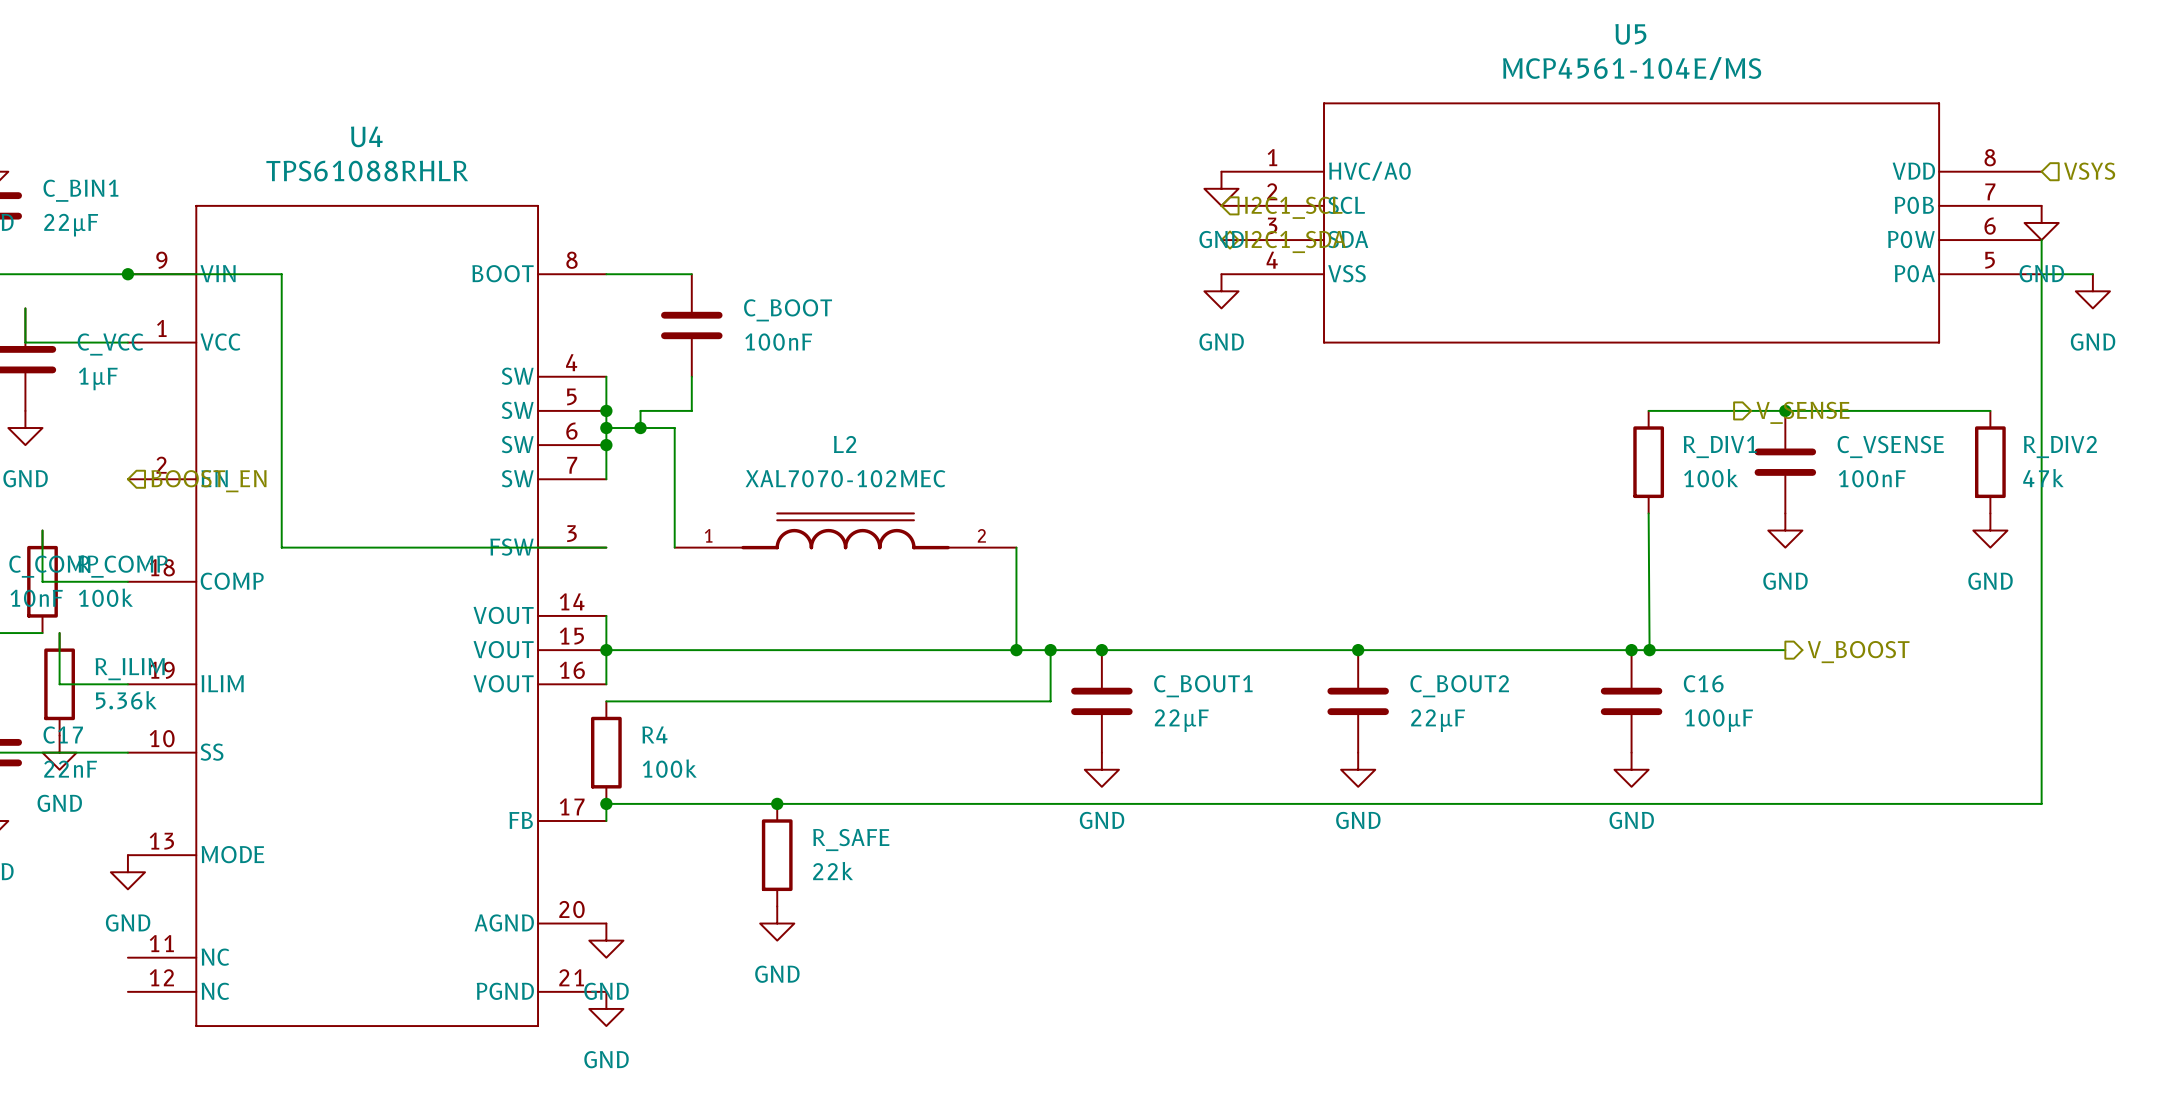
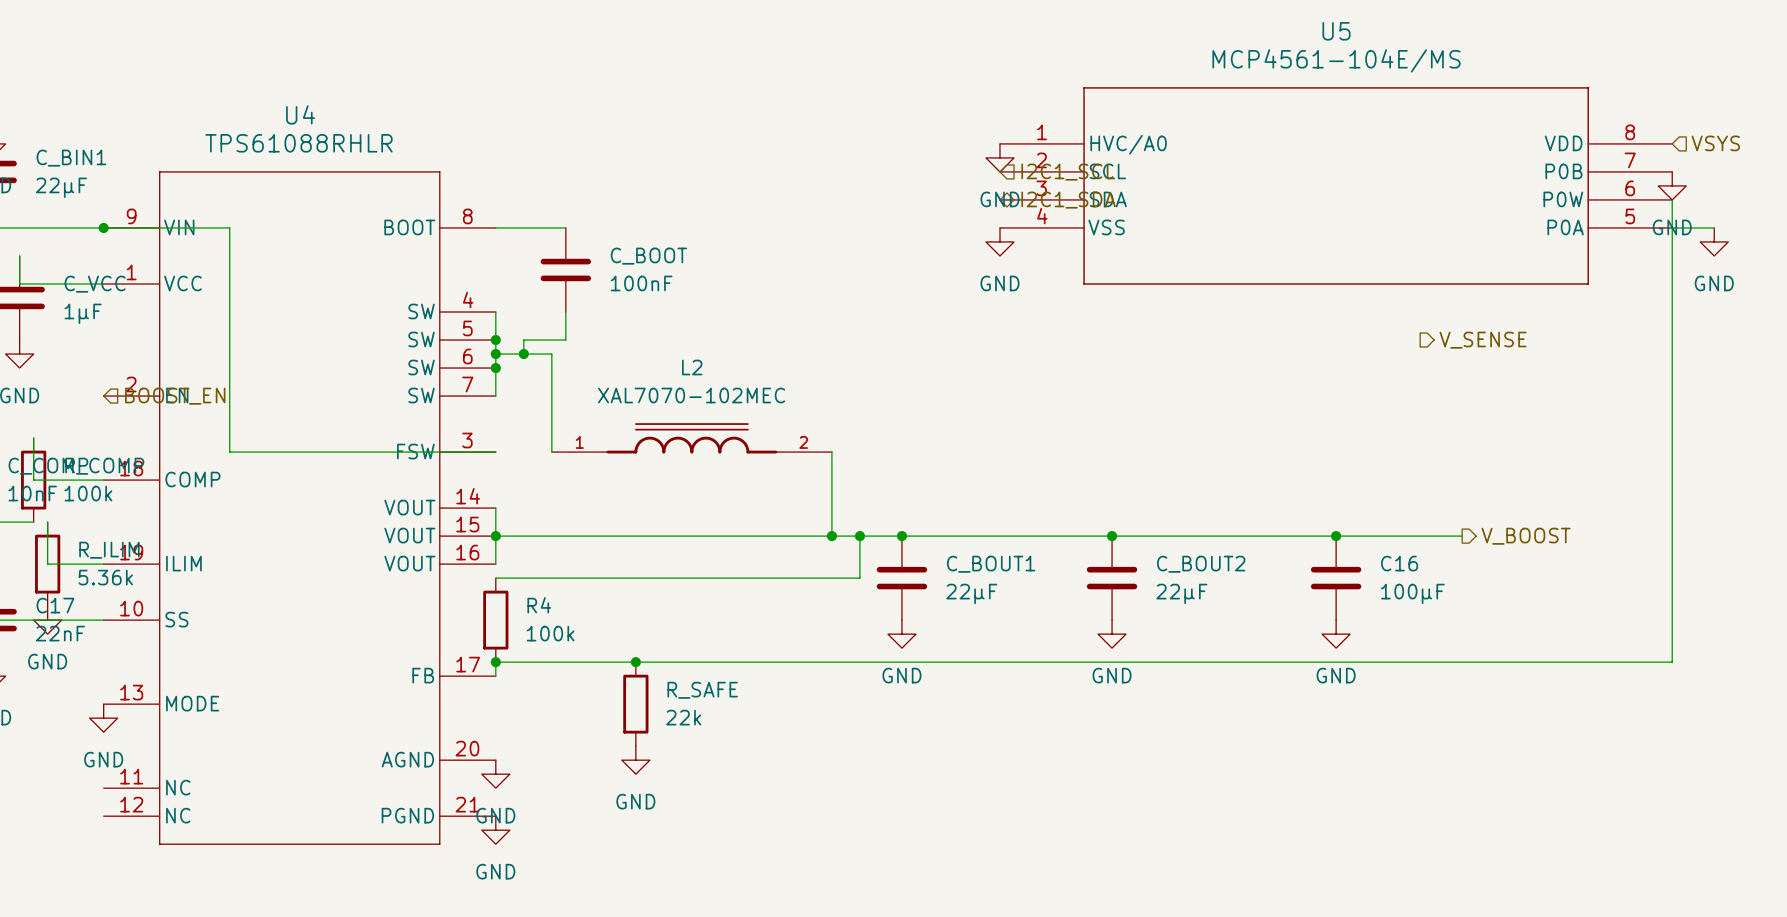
wire: (1648, 410) (1990, 410) -> none
junction: (1785, 410) -> none
R_DIV1: 100k (1648, 462) -> none
C_VSENSE: 100nF (1785, 462) -> none
R_DIV2: 47k (1990, 462) -> none
wire: (1648, 513) (1649, 650) -> none
power symbol: GND (1785, 530) -> none
power symbol: GND (1990, 530) -> none
junction: (1649, 650) -> none

